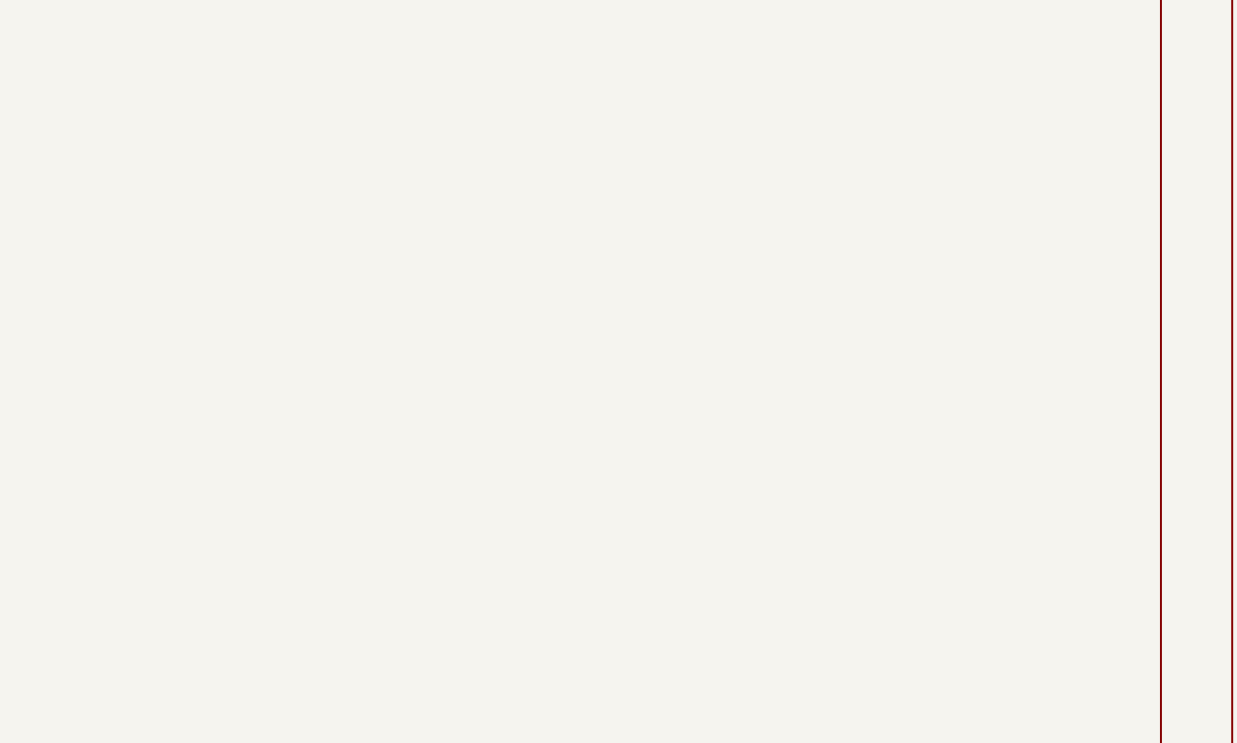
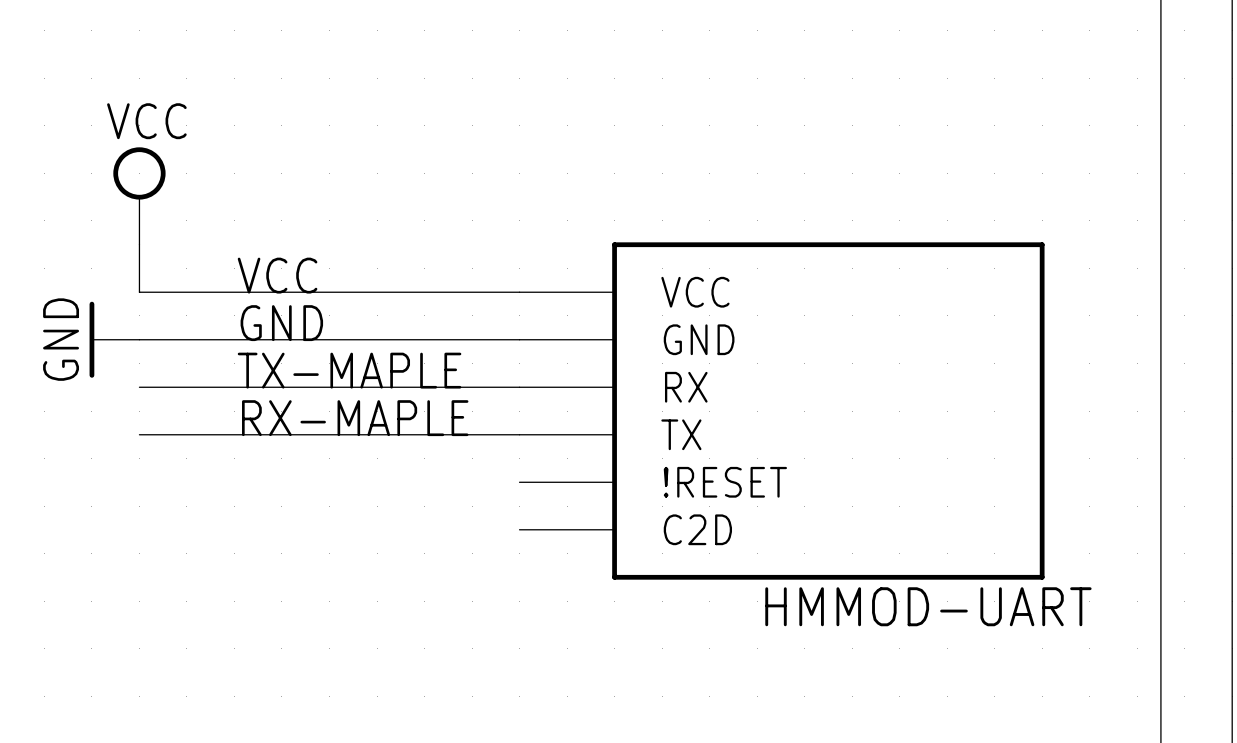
power symbol: none -> VCC (139, 196)
wire: none -> (139, 244) (139, 292) (519, 292)
label: none -> VCC (277, 275)
label: none -> GND (281, 323)
power symbol: none -> GND (114, 339)
wire: none -> (139, 339) (519, 339)
label: none -> TX-MAPLE (349, 370)
wire: none -> (139, 387) (519, 387)
HMMOD-UART: none -> (782, 411)
label: none -> RX-MAPLE (355, 418)
wire: none -> (139, 434) (519, 434)

